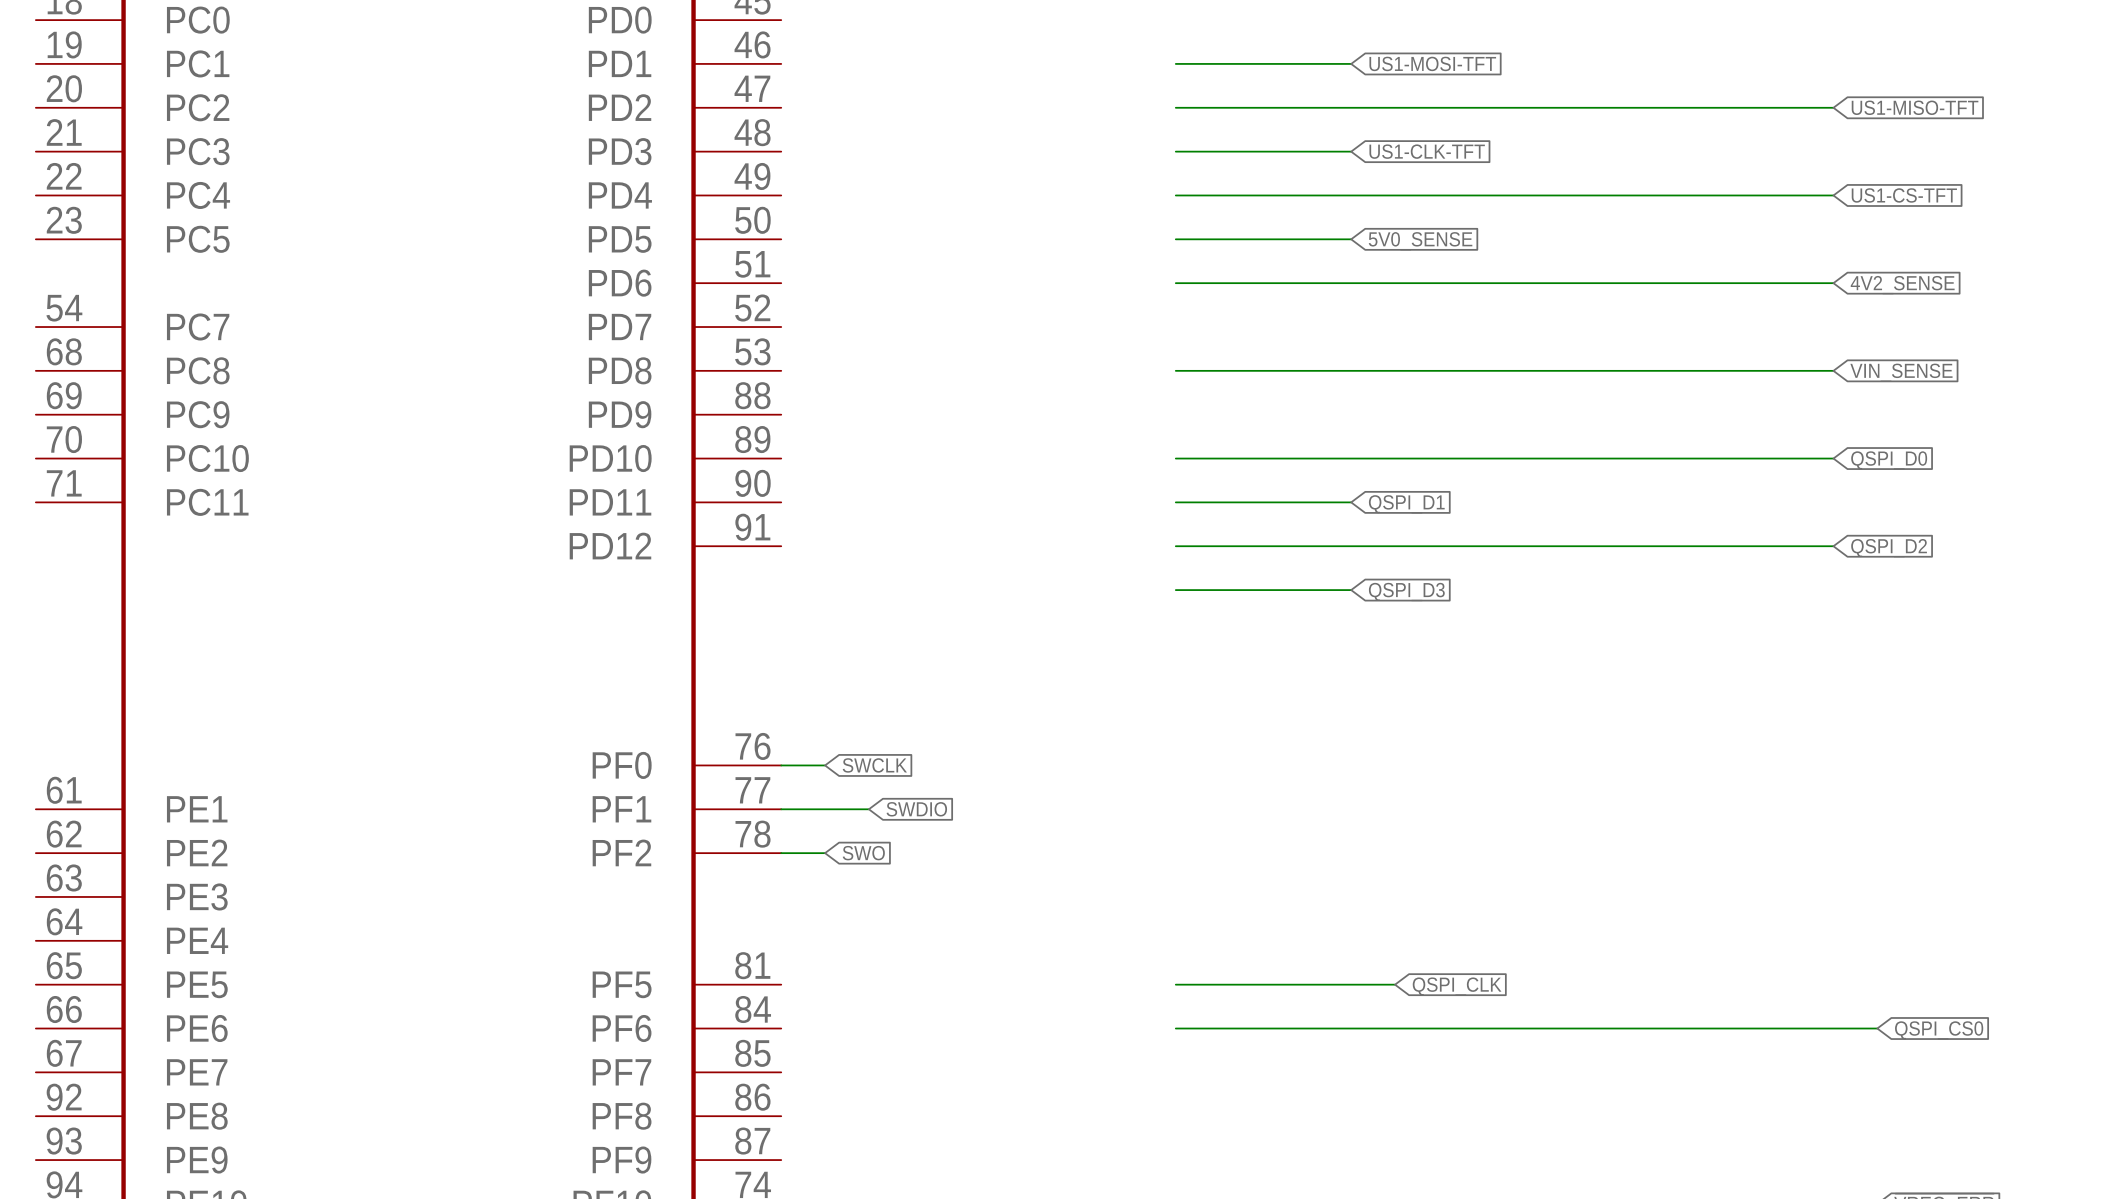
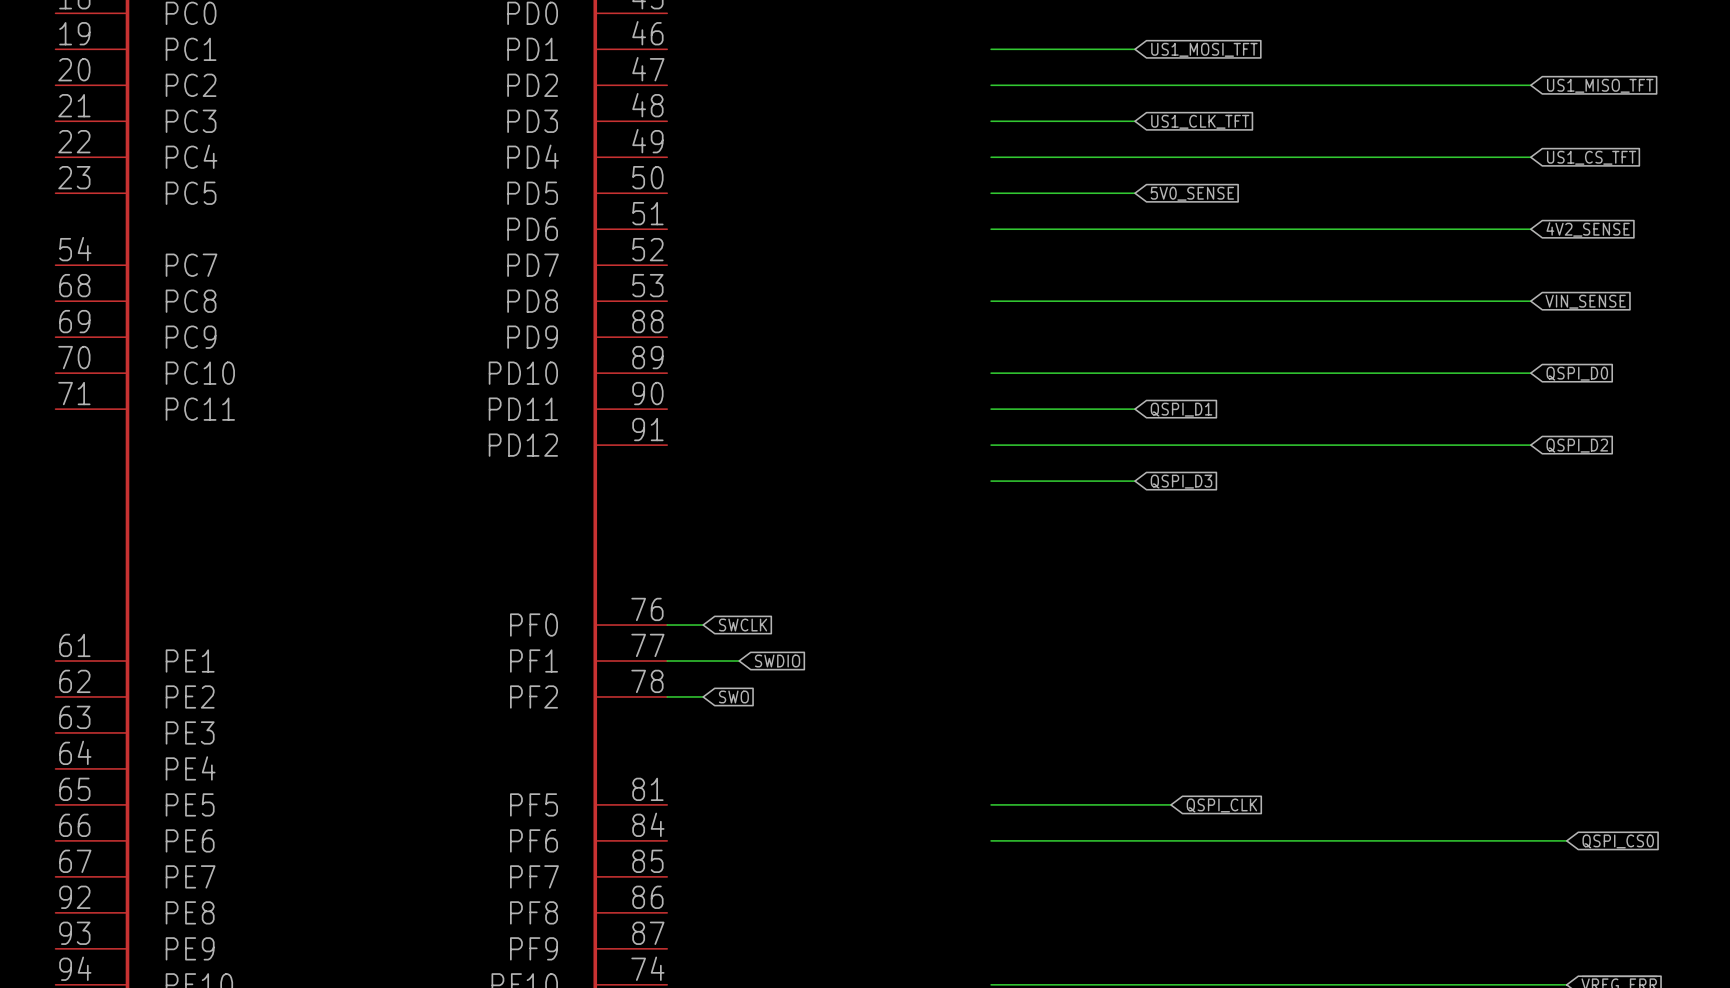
global label: US1-MOSI-TFT (1432, 63) -> US1_MOSI_TFT (1204, 49)
global label: US1-MISO-TFT (1915, 107) -> US1_MISO_TFT (1600, 85)
global label: US1-CLK-TFT (1427, 151) -> US1_CLK_TFT (1200, 121)
global label: US1-CS-TFT (1904, 195) -> US1_CS_TFT (1591, 157)

